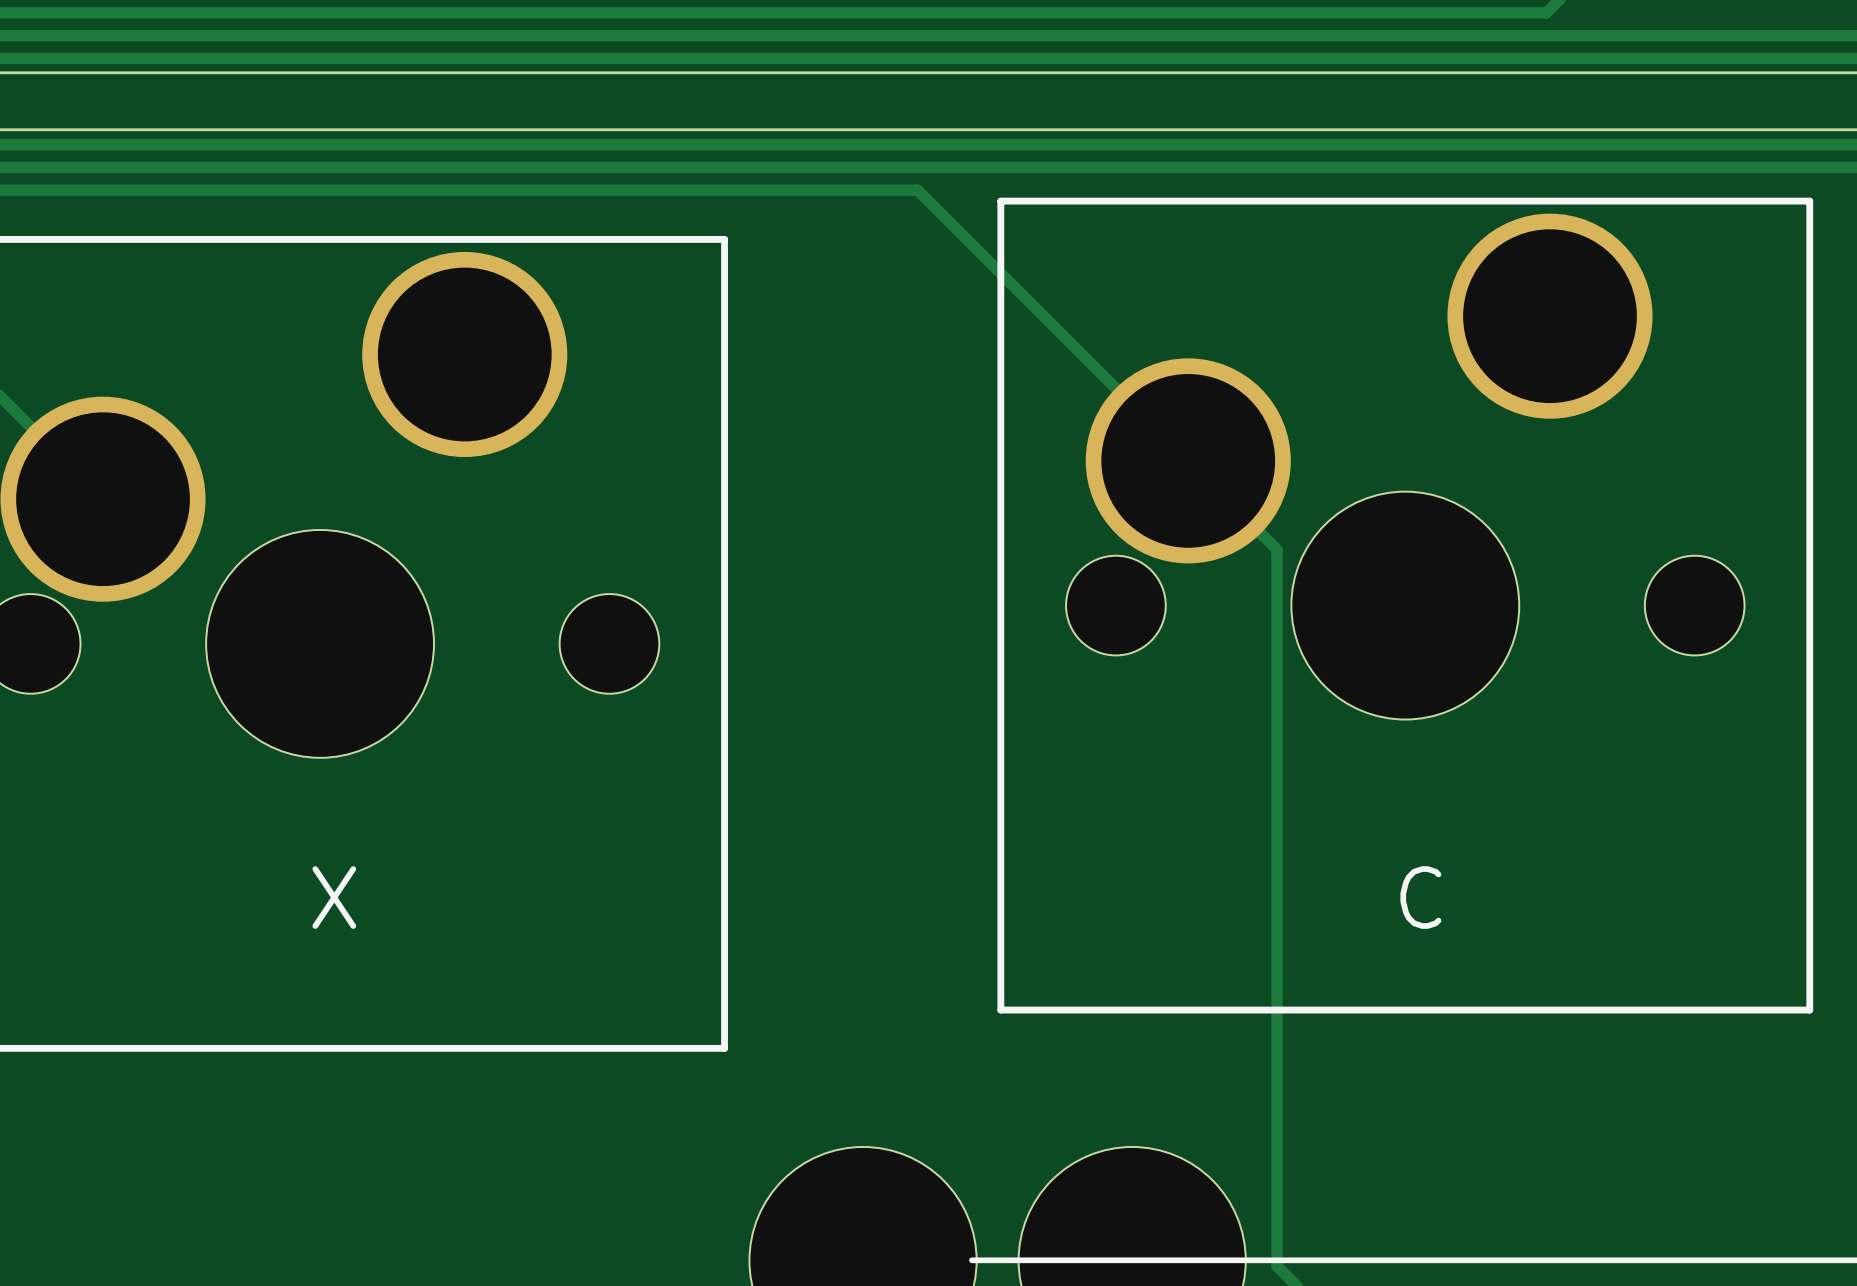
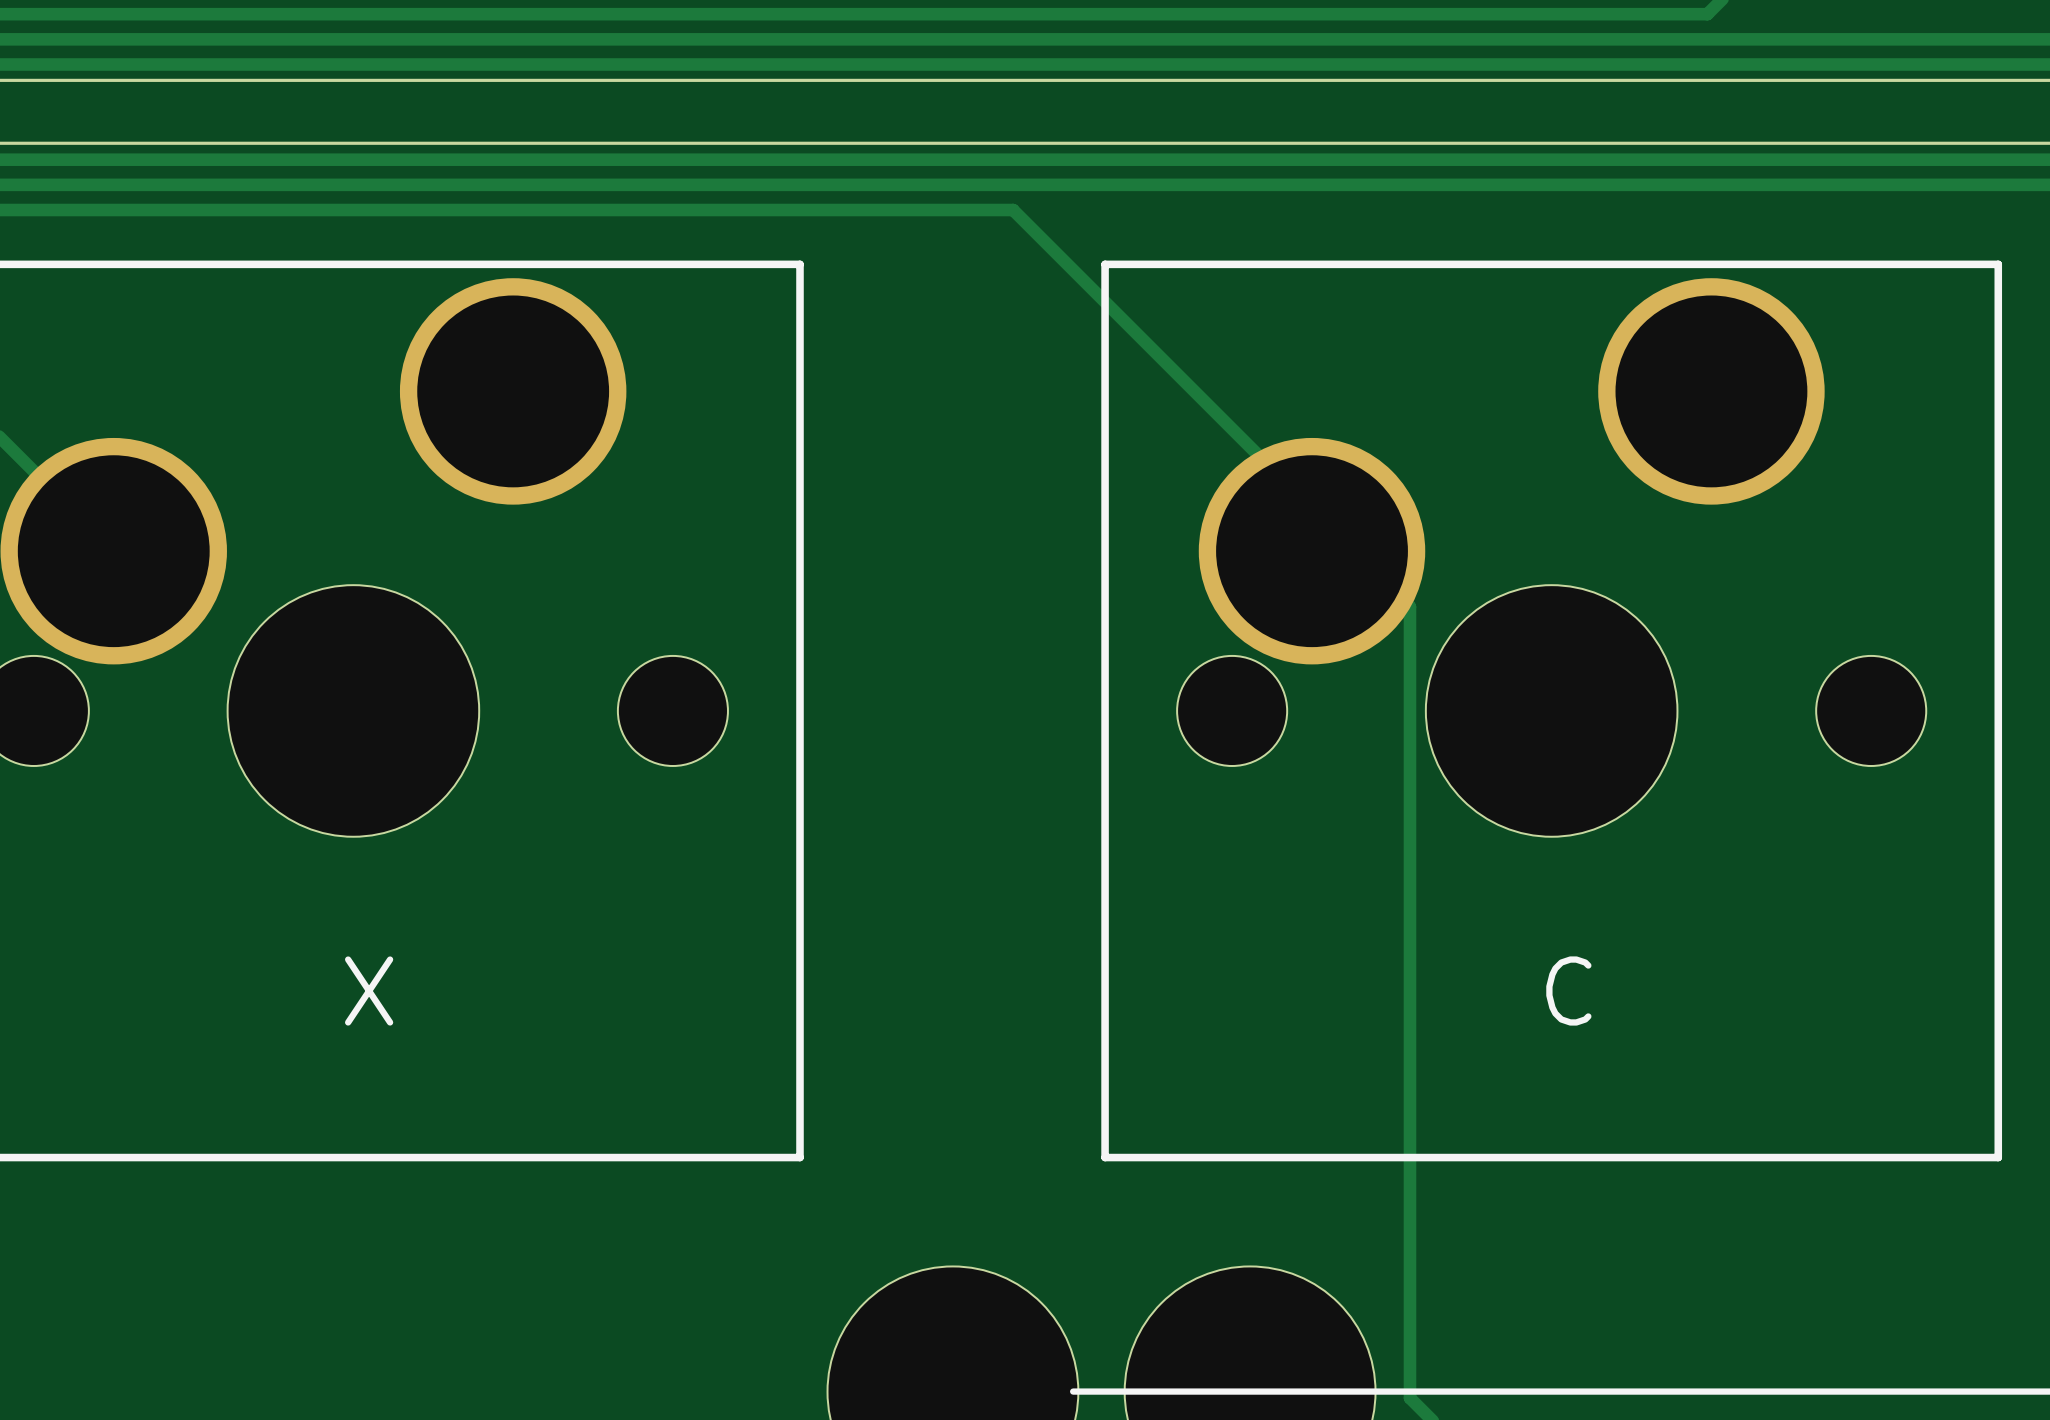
part position: (1405, 605) -> (1551, 710)

